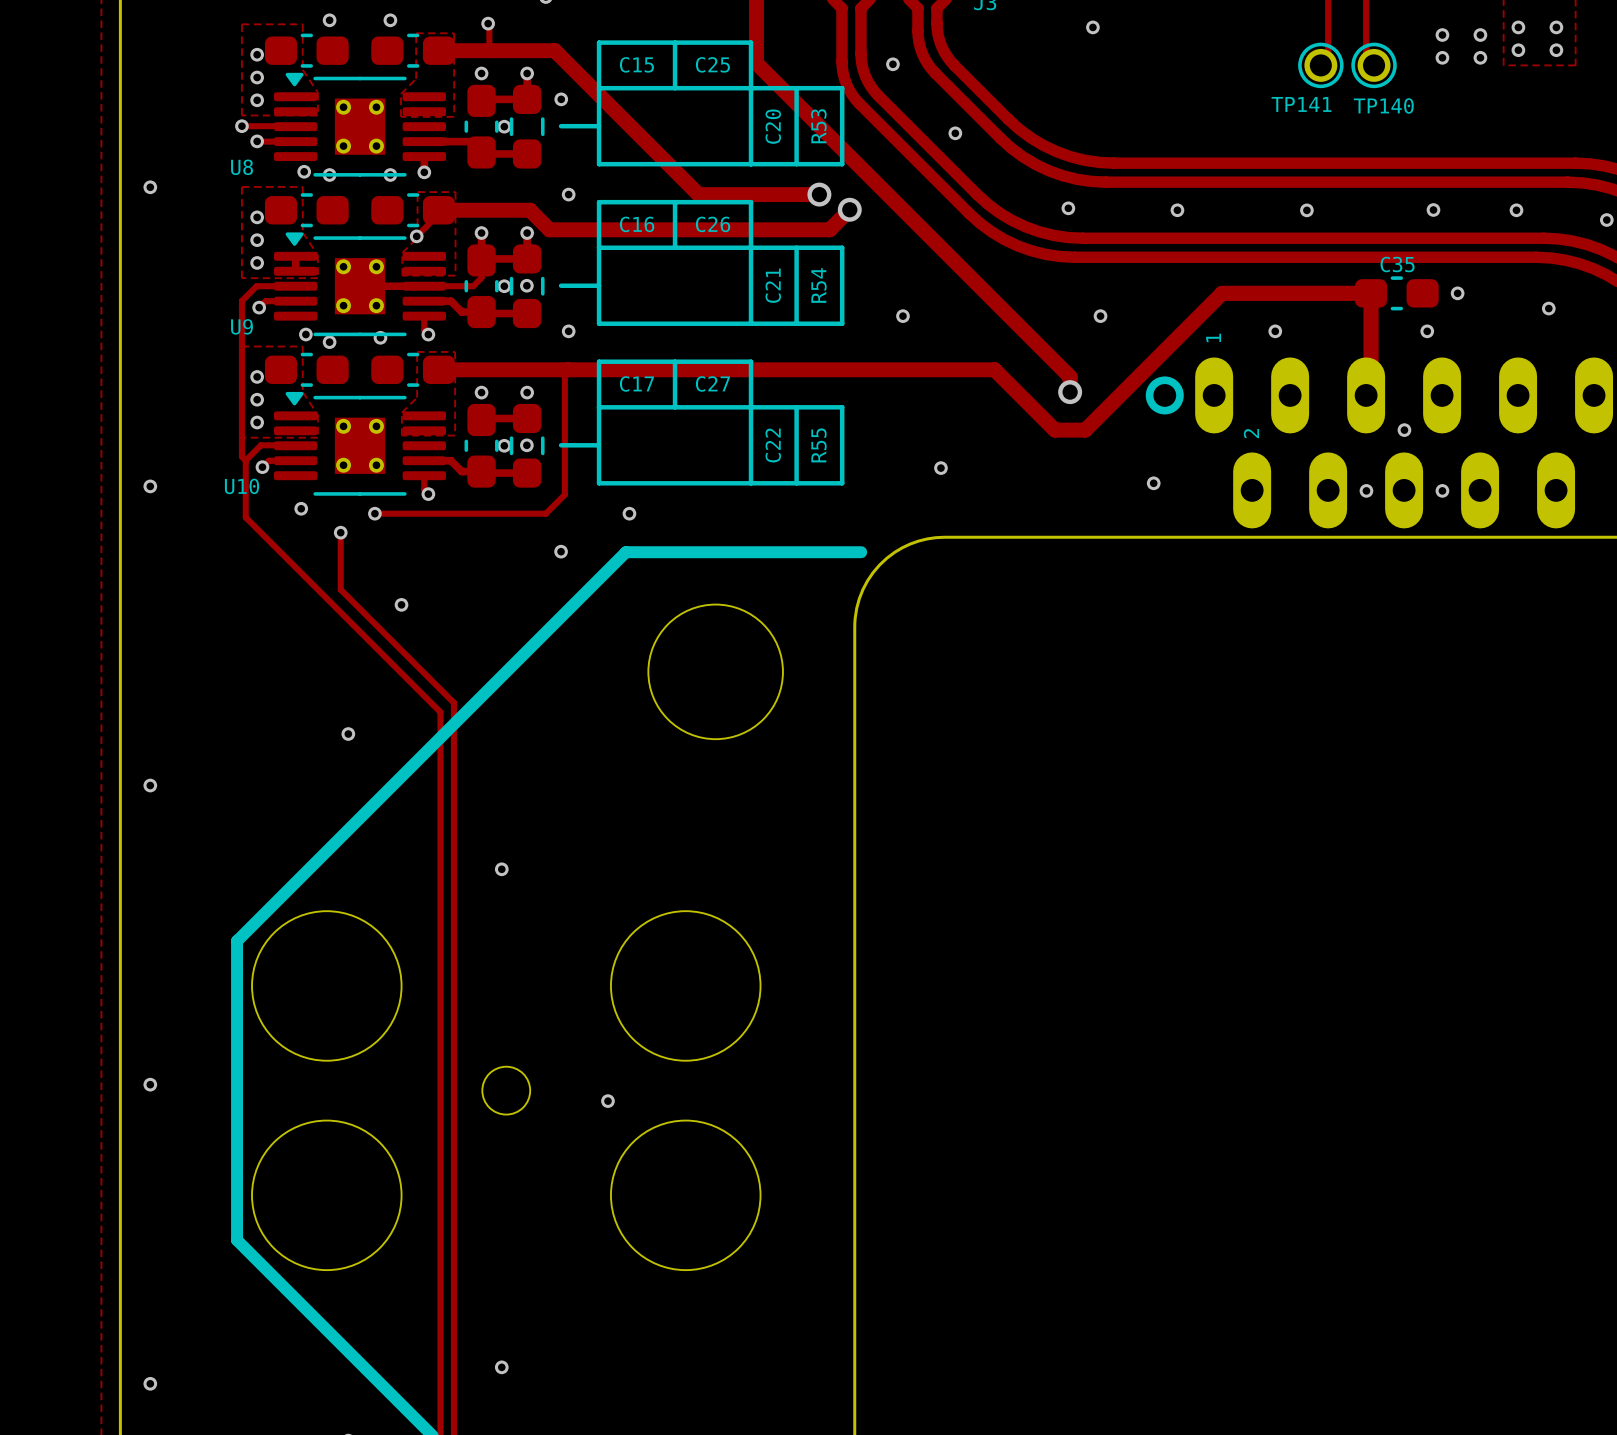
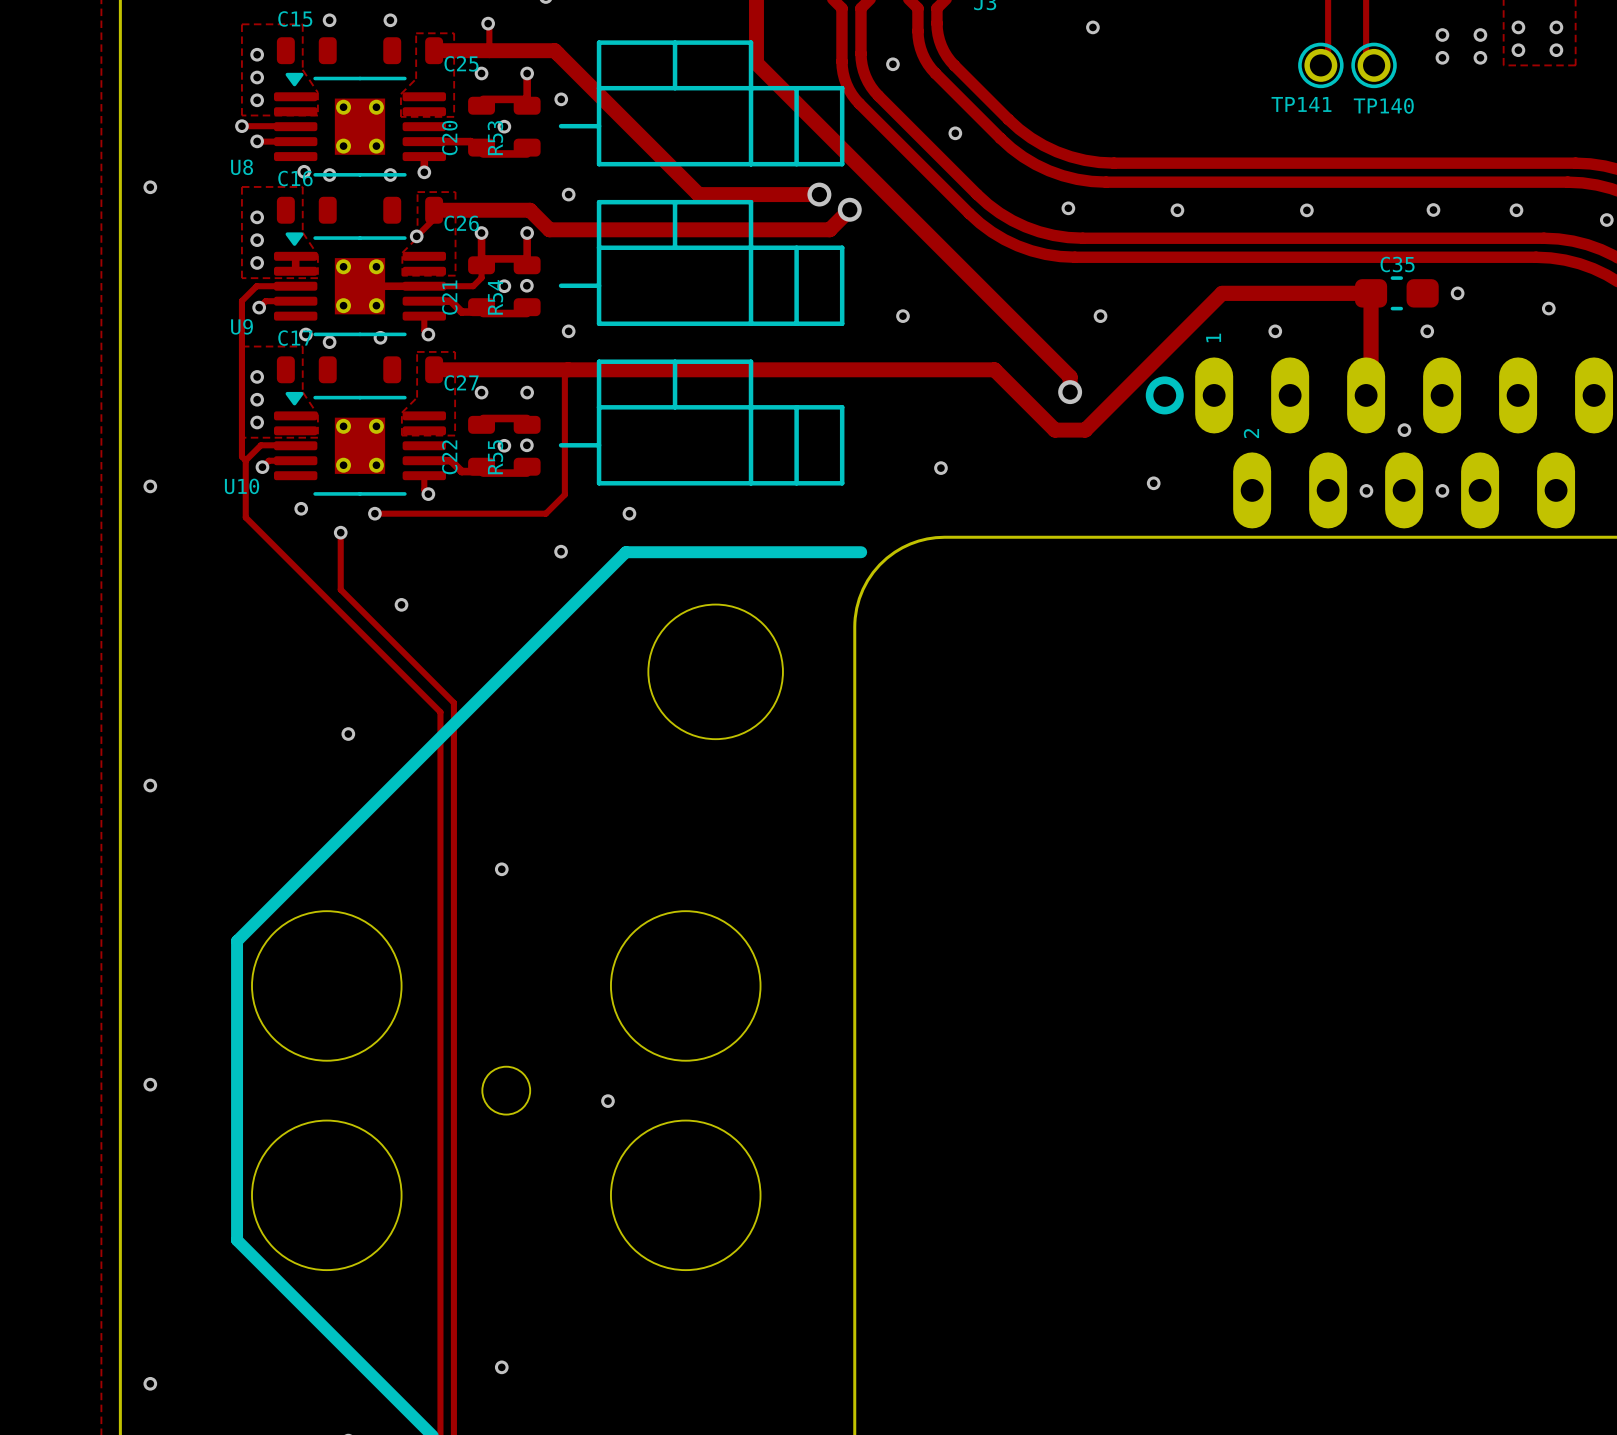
C15 footprint: [264, 33, 349, 68] -> [276, 37, 337, 65]
C25 footprint: [371, 33, 456, 68] -> [383, 37, 444, 65]
C15 name position: C15 (636, 64) -> C15 (295, 18)
C25 name position: C25 (712, 64) -> C25 (461, 63)
C20 footprint: [464, 84, 499, 169] -> [468, 96, 496, 157]
R53 footprint: [509, 84, 545, 169] -> [513, 96, 541, 157]
C20 name position: C20 (773, 126) -> C20 (449, 138)
R53 name position: R53 (818, 126) -> R53 (495, 138)
C16 footprint: [264, 193, 349, 228] -> [276, 196, 337, 224]
C26 footprint: [371, 193, 456, 228] -> [383, 196, 444, 224]
C16 name position: C16 (637, 224) -> C16 (295, 178)
C26 name position: C26 (713, 224) -> C26 (461, 223)
C21 footprint: [464, 244, 499, 329] -> [468, 256, 496, 317]
R54 footprint: [509, 244, 545, 329] -> [513, 256, 541, 317]
C21 name position: C21 (773, 285) -> C21 (449, 297)
R54 name position: R54 (818, 285) -> R54 (495, 297)
C17 footprint: [264, 352, 349, 387] -> [276, 356, 337, 384]
C27 footprint: [371, 352, 456, 387] -> [383, 356, 444, 384]
C17 name position: C17 (636, 383) -> C17 (295, 338)
C27 name position: C27 (712, 383) -> C27 (461, 382)
C22 footprint: [464, 403, 499, 488] -> [468, 415, 496, 476]
R55 footprint: [509, 403, 545, 488] -> [513, 415, 541, 476]
C22 name position: C22 (773, 445) -> C22 (449, 457)
R55 name position: R55 (818, 445) -> R55 (495, 457)

